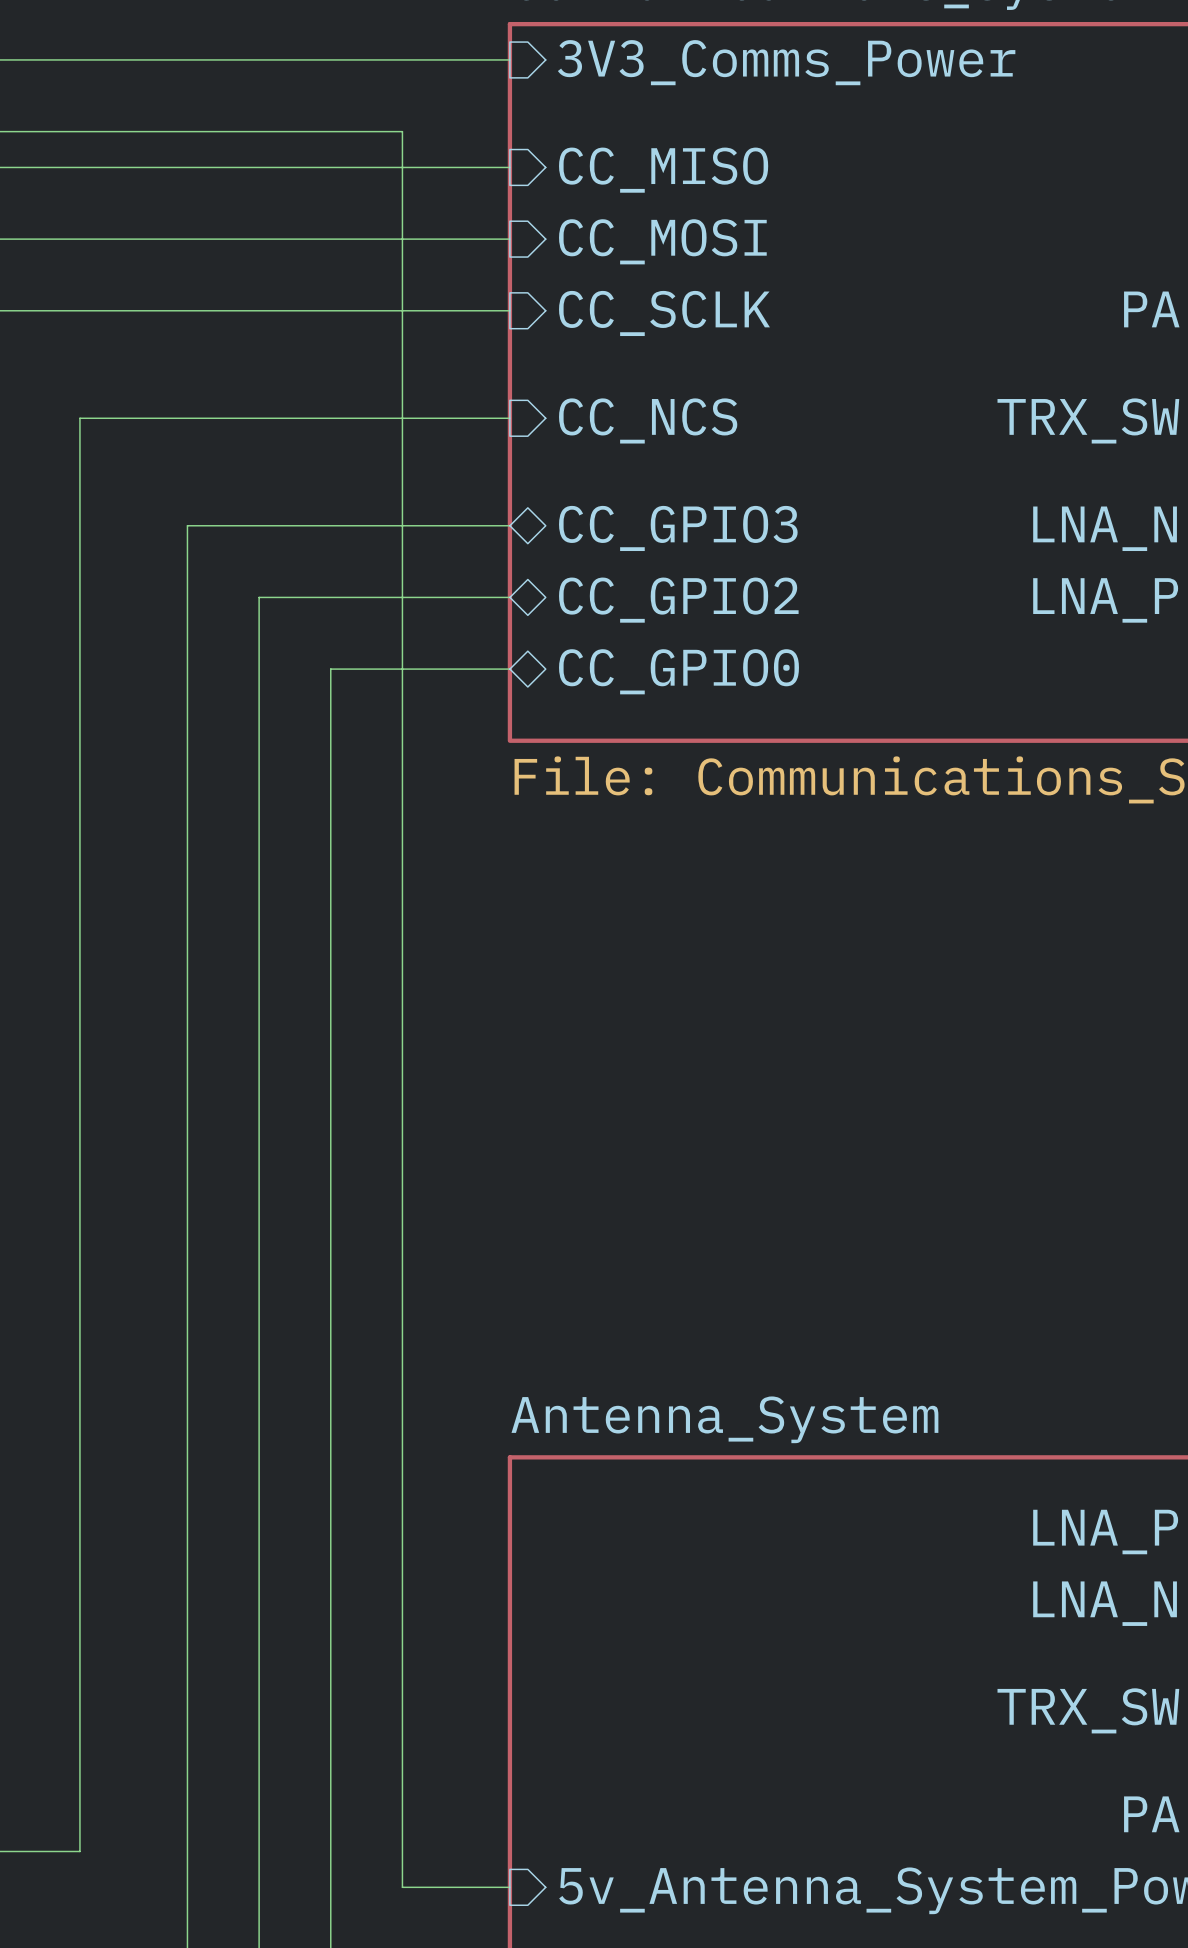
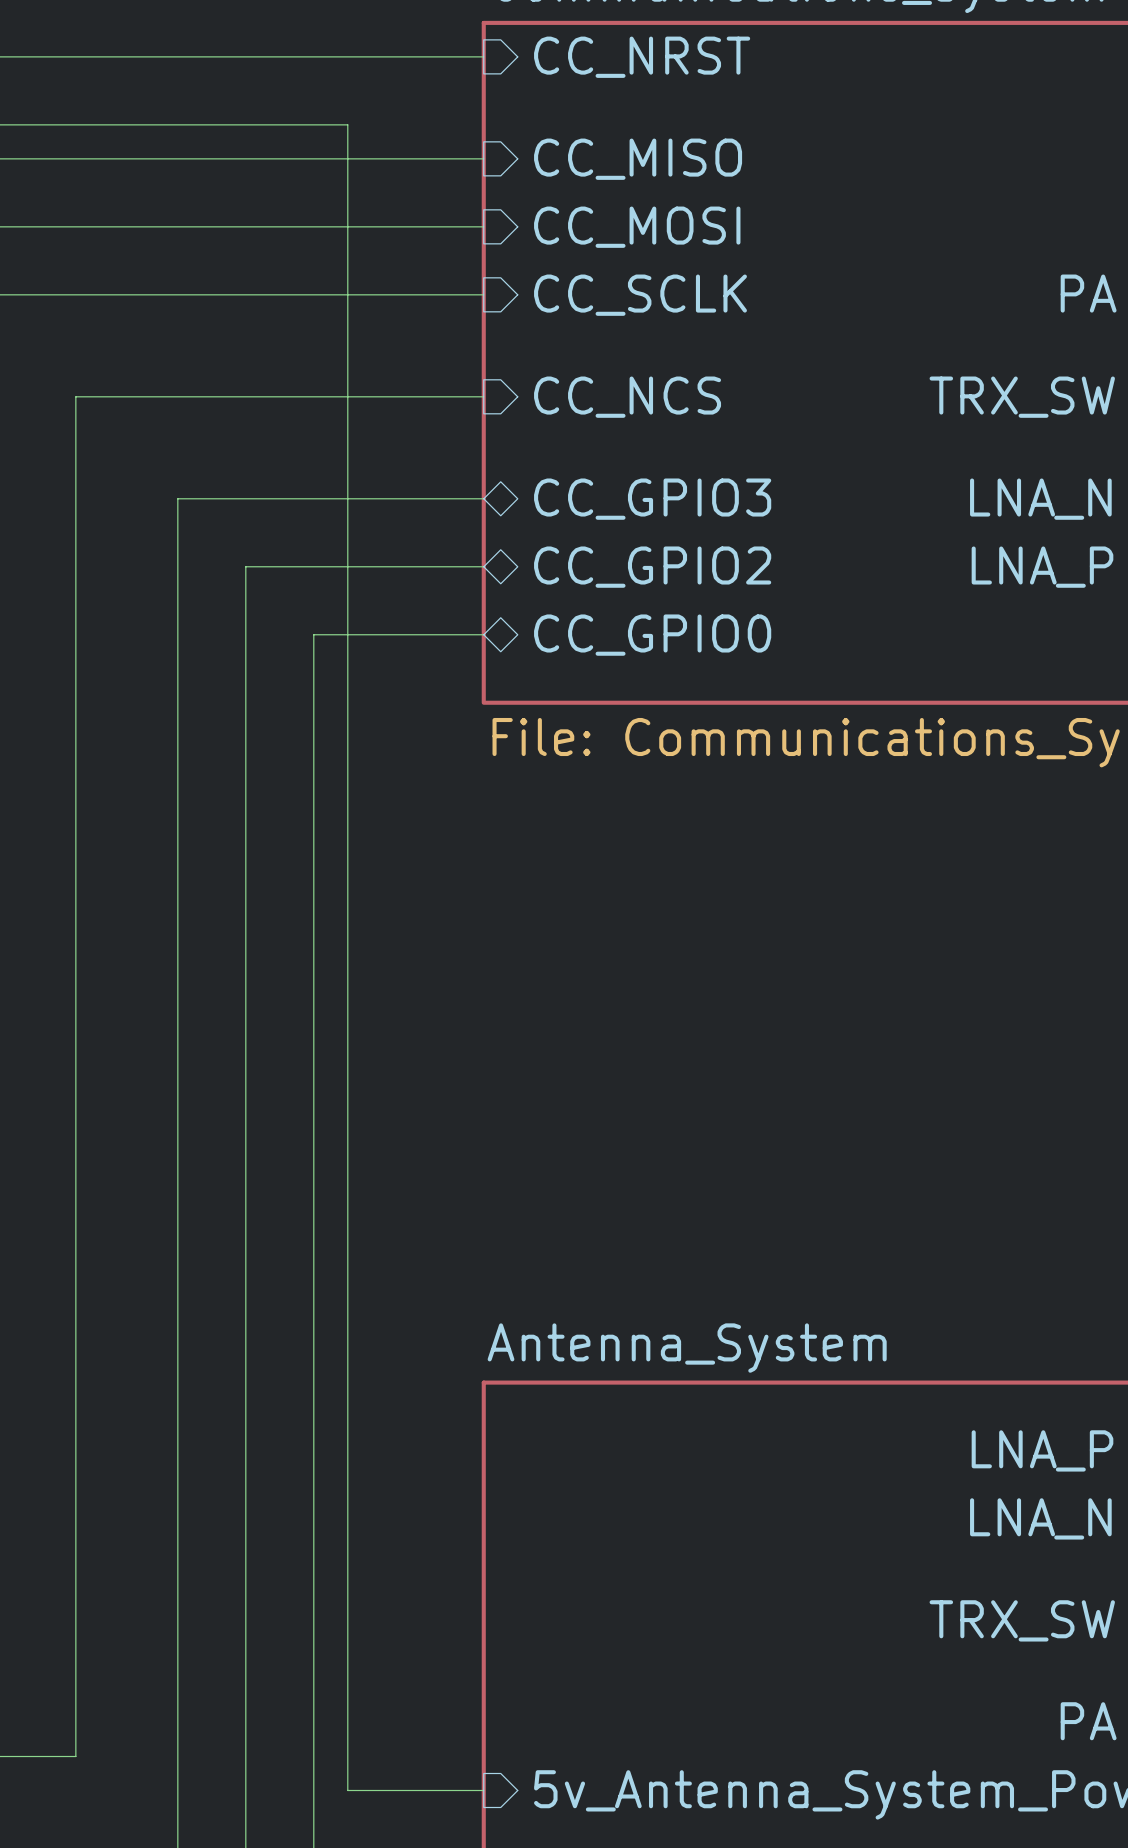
sheet pin: 3V3_Comms_Power (786, 62) -> CC_NRST (642, 57)
wire: (366, 131) (402, 131) (402, 1887) -> (347, 124) (347, 1790) (381, 1790)

